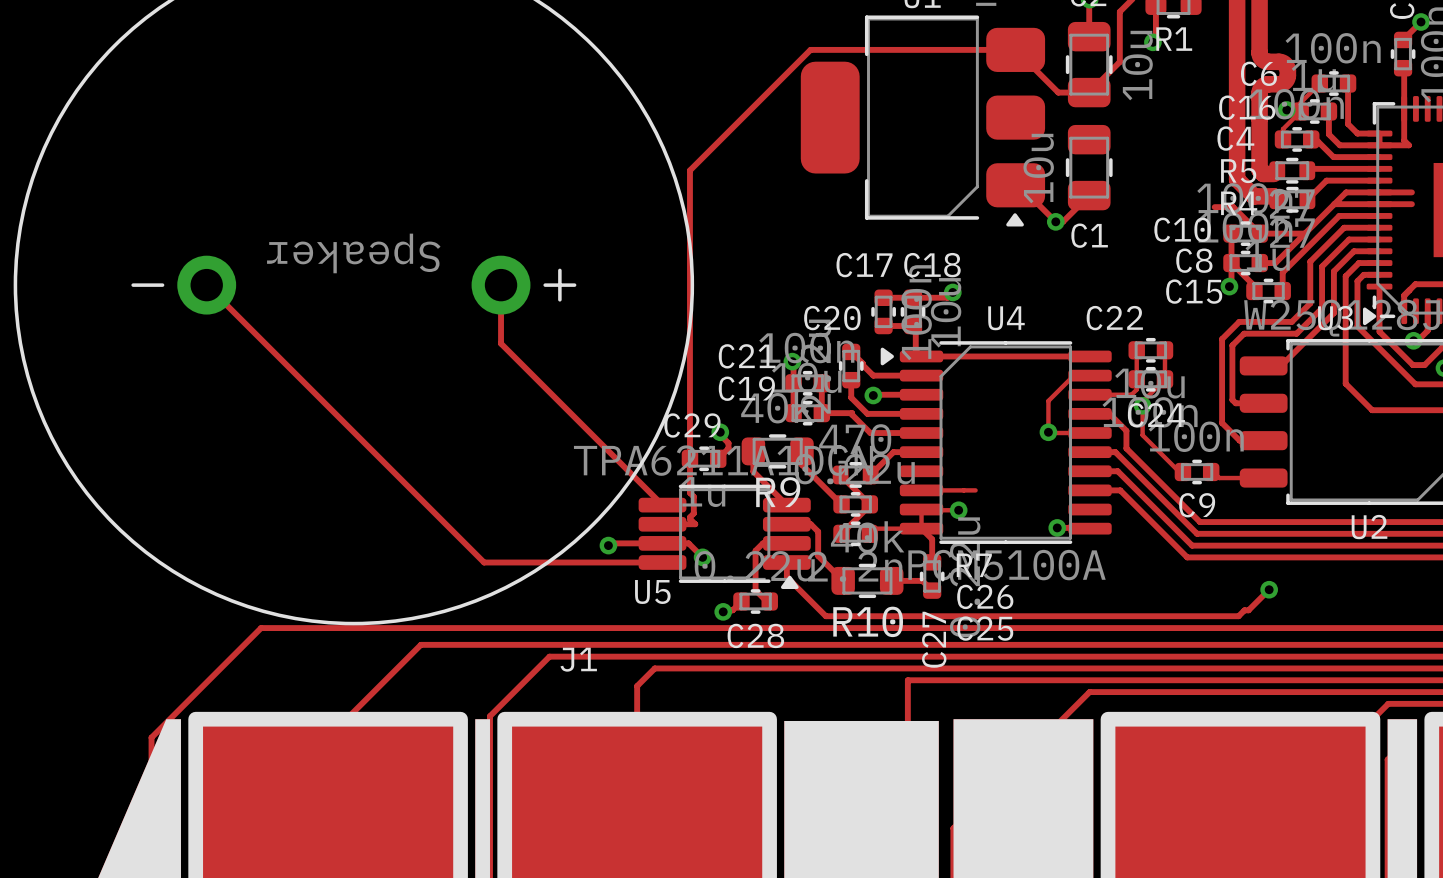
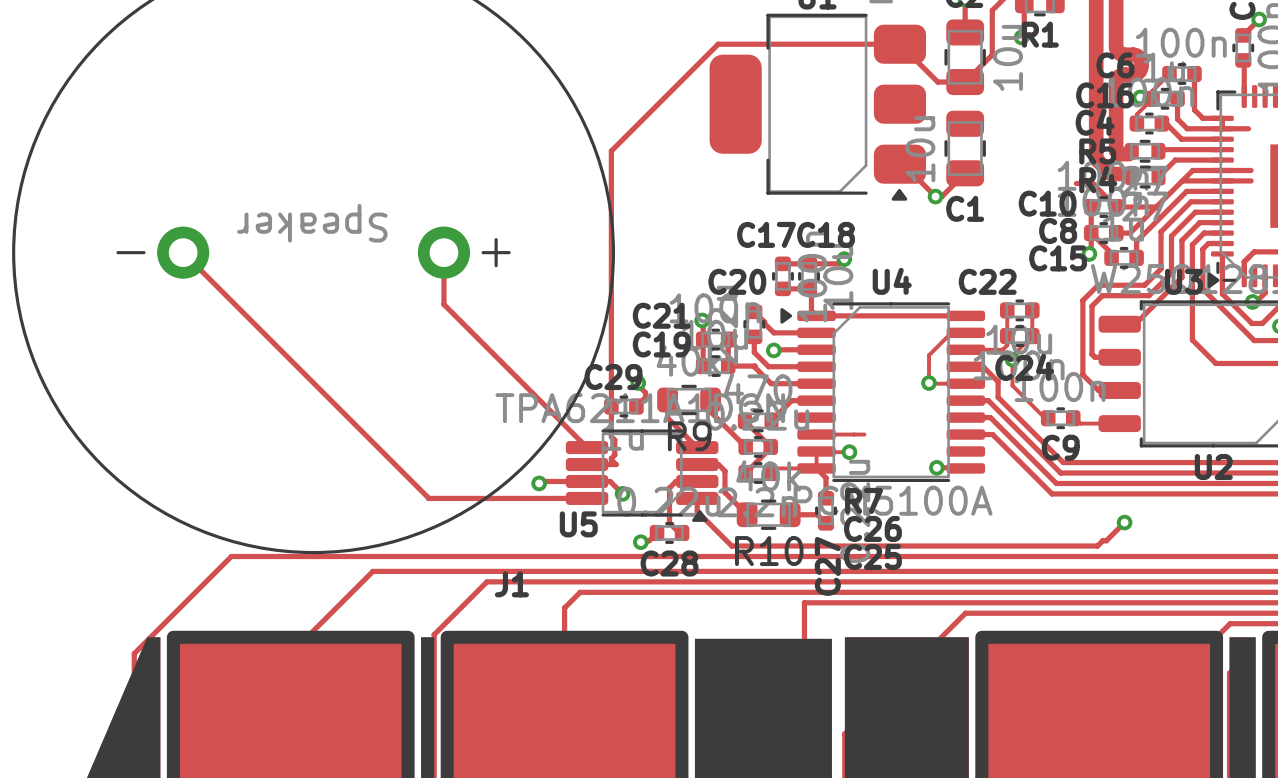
track: (1404, 108) (1404, 140) (1408, 145) -> none

